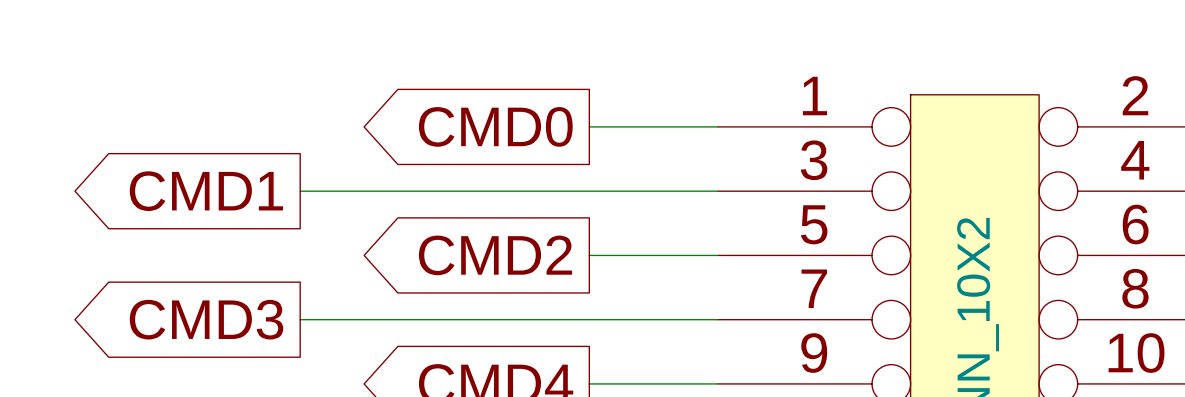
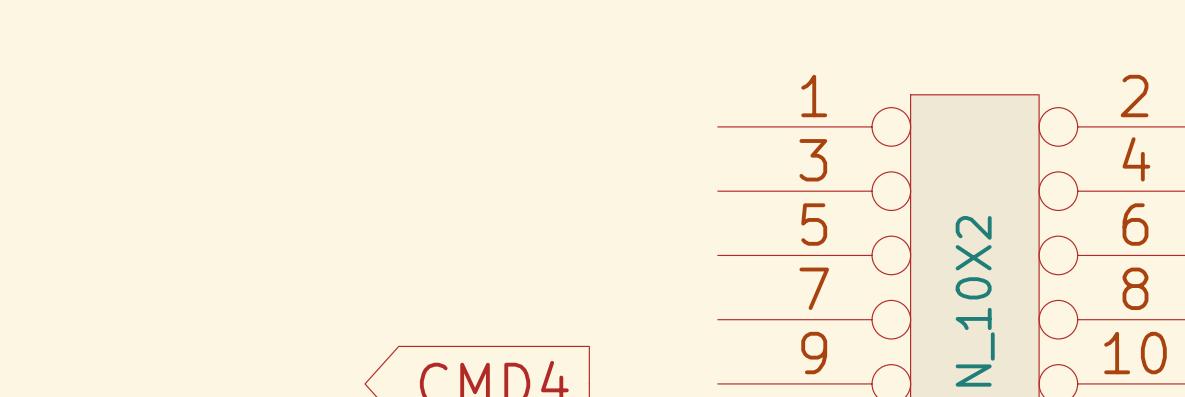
global label: CMD0 (495, 126) -> none
wire: (589, 126) (717, 126) -> none
global label: CMD1 (206, 191) -> none
wire: (300, 191) (717, 191) -> none
global label: CMD2 (495, 255) -> none
wire: (589, 255) (717, 255) -> none
global label: CMD3 (206, 319) -> none
wire: (300, 319) (717, 319) -> none
wire: (589, 383) (717, 383) -> none

